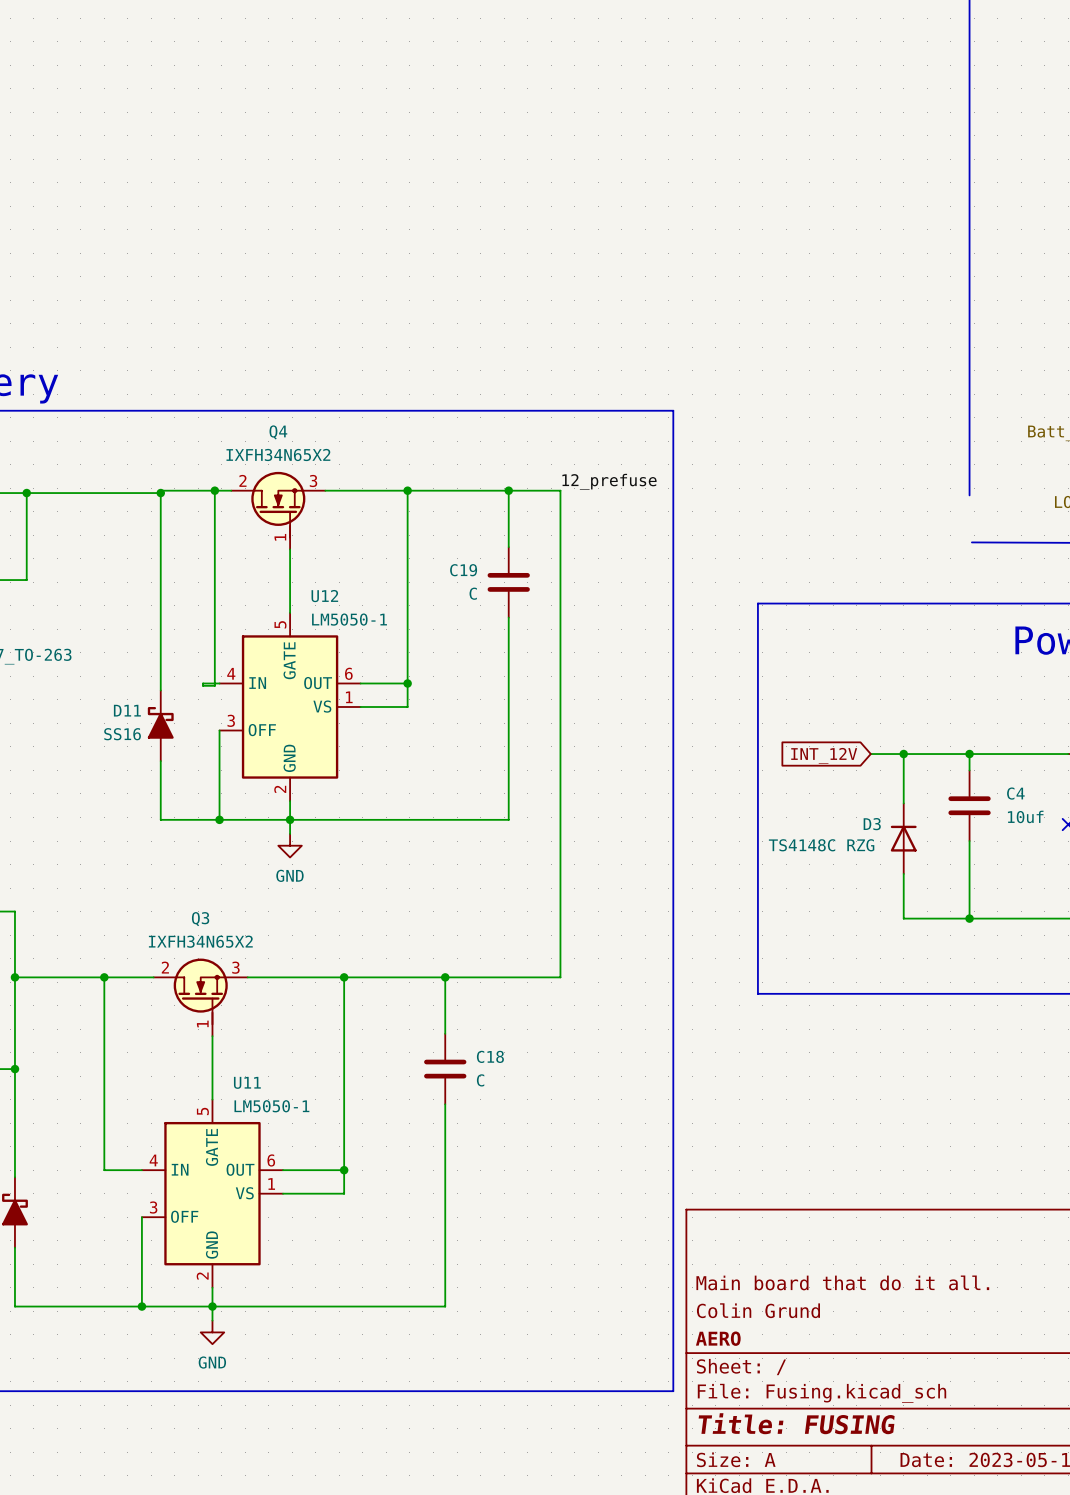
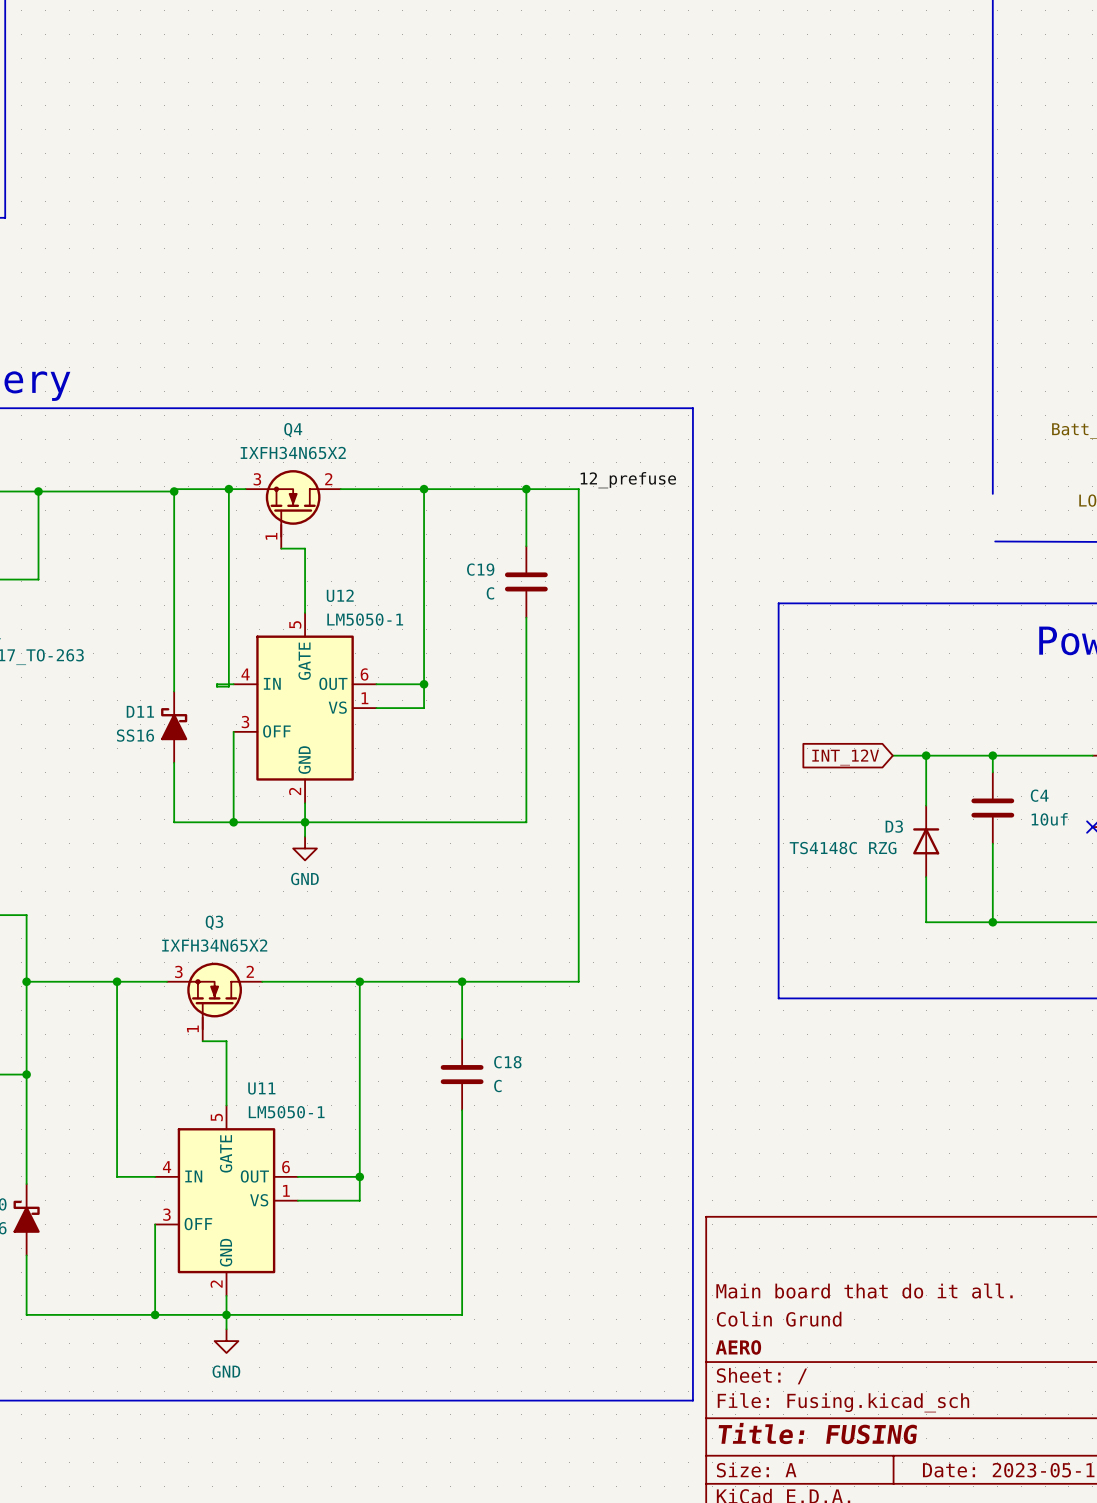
Q4 flip: as is (278, 504) -> left-right (293, 503)
wire: none -> (281, 548) (305, 548)
Q3 flip: as is (200, 991) -> left-right (214, 996)
wire: none -> (202, 1041) (226, 1041)

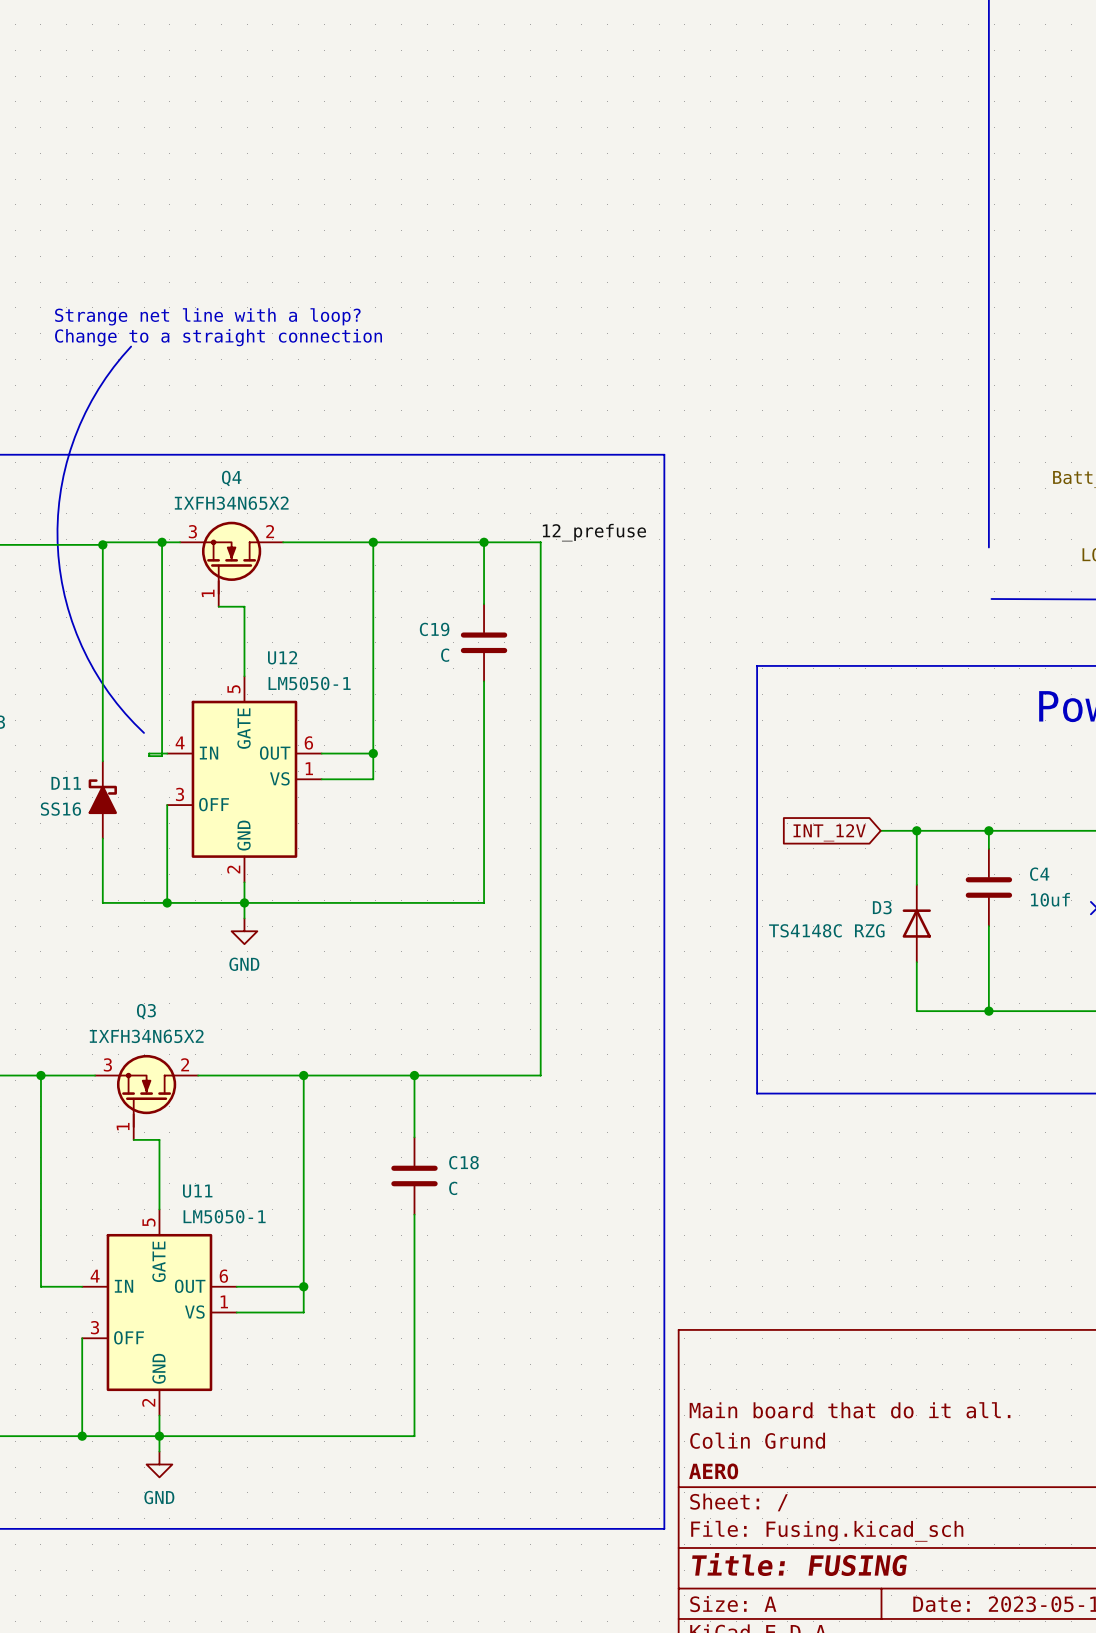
text: none -> Strange net line with a loop? (207, 316)
text: none -> Change to a straight connection (218, 337)
line: none -> (131, 346) (98, 389) (74, 437) (61, 488) (57, 542) (64, 595) (81, 646) (108, 692) (144, 732)

